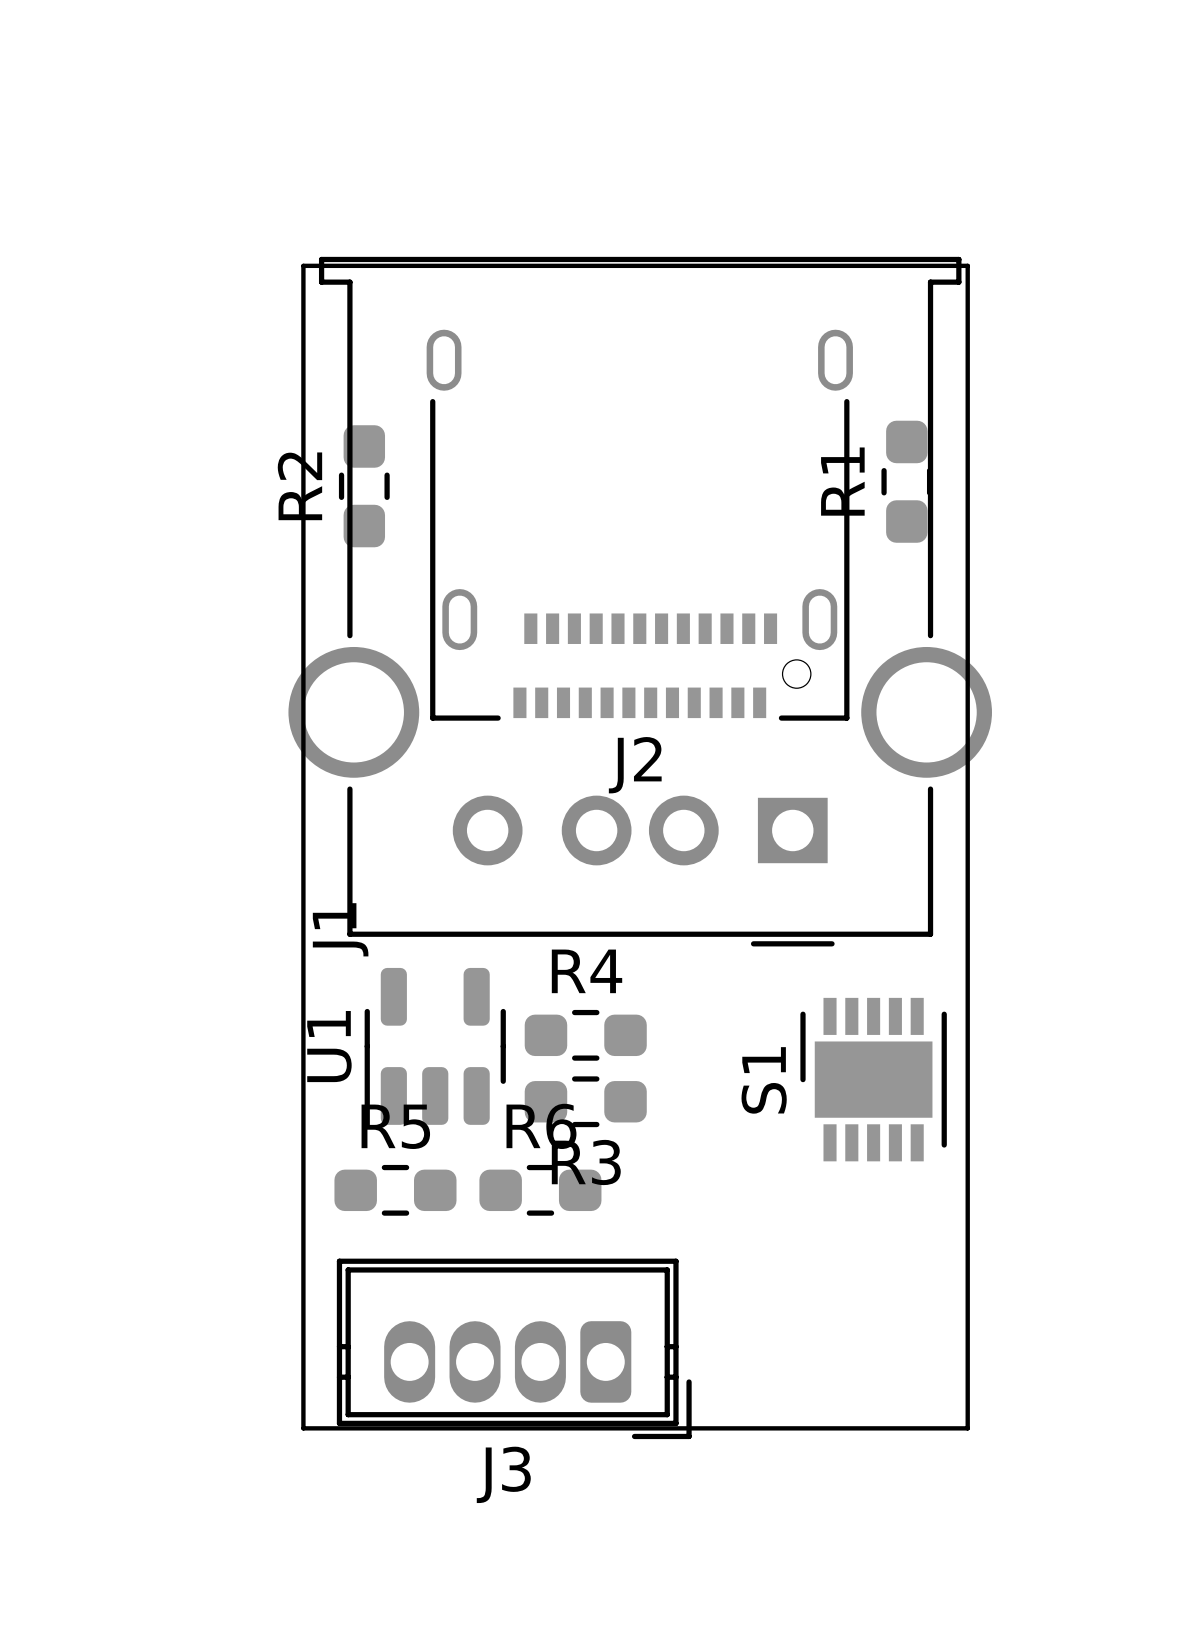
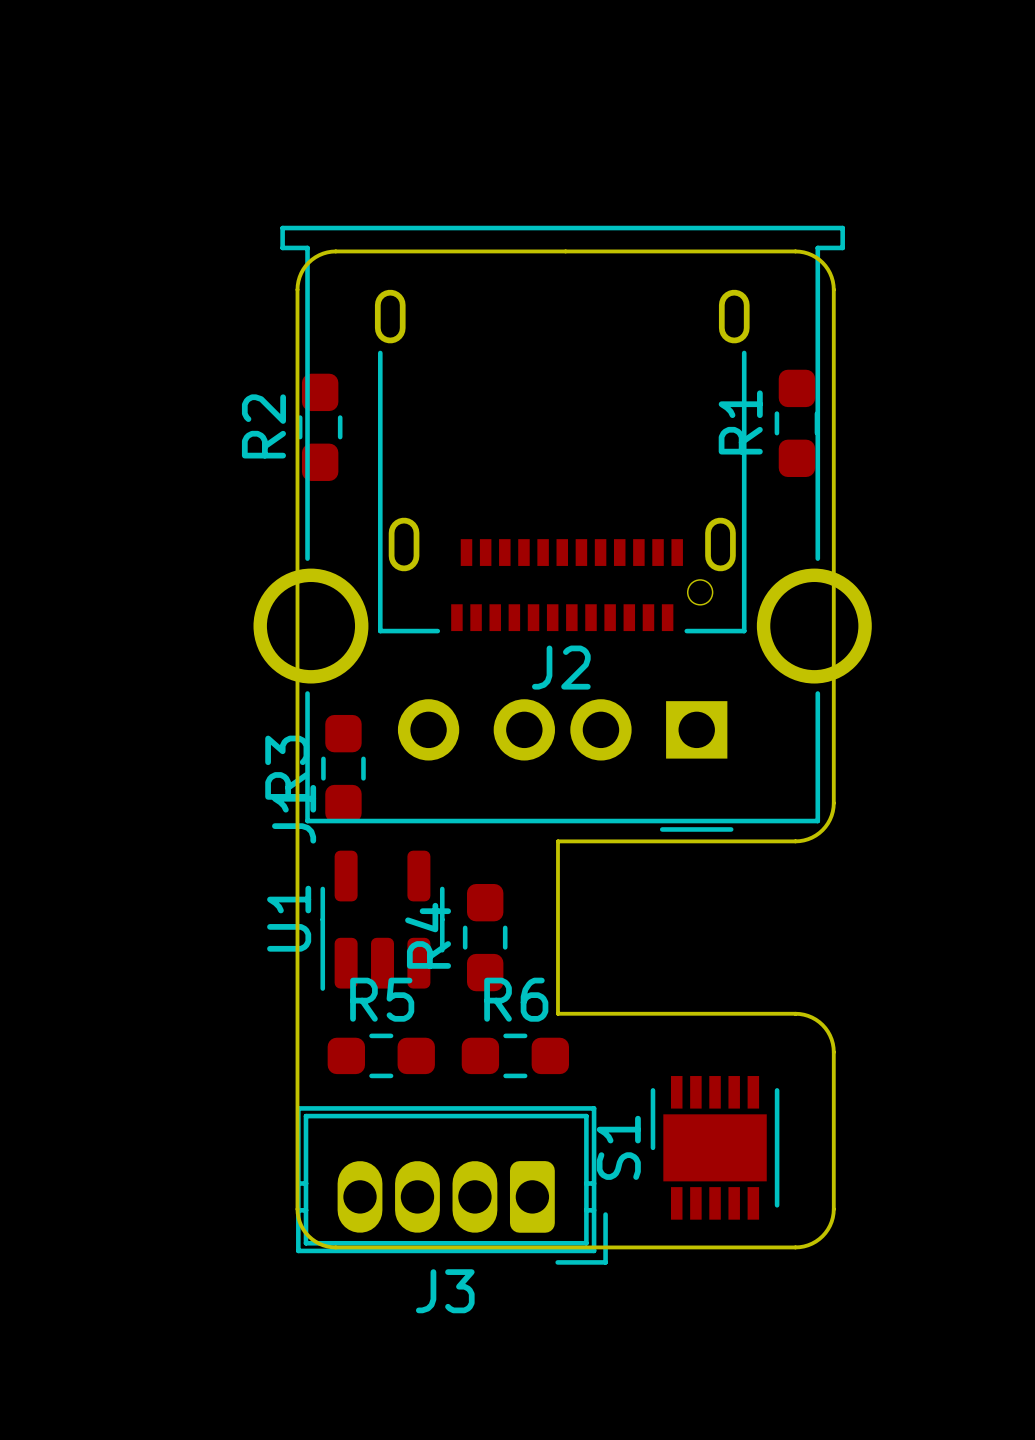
board edge: (303, 265) (967, 265) (967, 1428) (303, 1428) (303, 265) -> (335, 251) (319, 255) (308, 262) (299, 277) (297, 289) (297, 1209) (301, 1225) (315, 1241) (335, 1247) (795, 1247) (812, 1243) (825, 1233) (833, 1213) (833, 1052) (827, 1031) (815, 1019) (799, 1014) (557, 1013) (557, 841) (799, 841) (815, 835) (830, 819) (833, 803) (833, 289) (830, 273) (815, 257) (795, 251) (335, 251)
R4 name position: R4 (587, 971) -> R4 (428, 935)
R4 rotation: 0° (585, 1035) -> 90° clockwise (485, 937)
S1 position: (873, 1079) -> (715, 1147)
R3 rotation: 0° (585, 1101) -> 90° clockwise (343, 768)
R3 position: (585, 1101) -> (343, 768)
R5 position: (395, 1190) -> (381, 1055)
R6 position: (540, 1190) -> (515, 1055)

